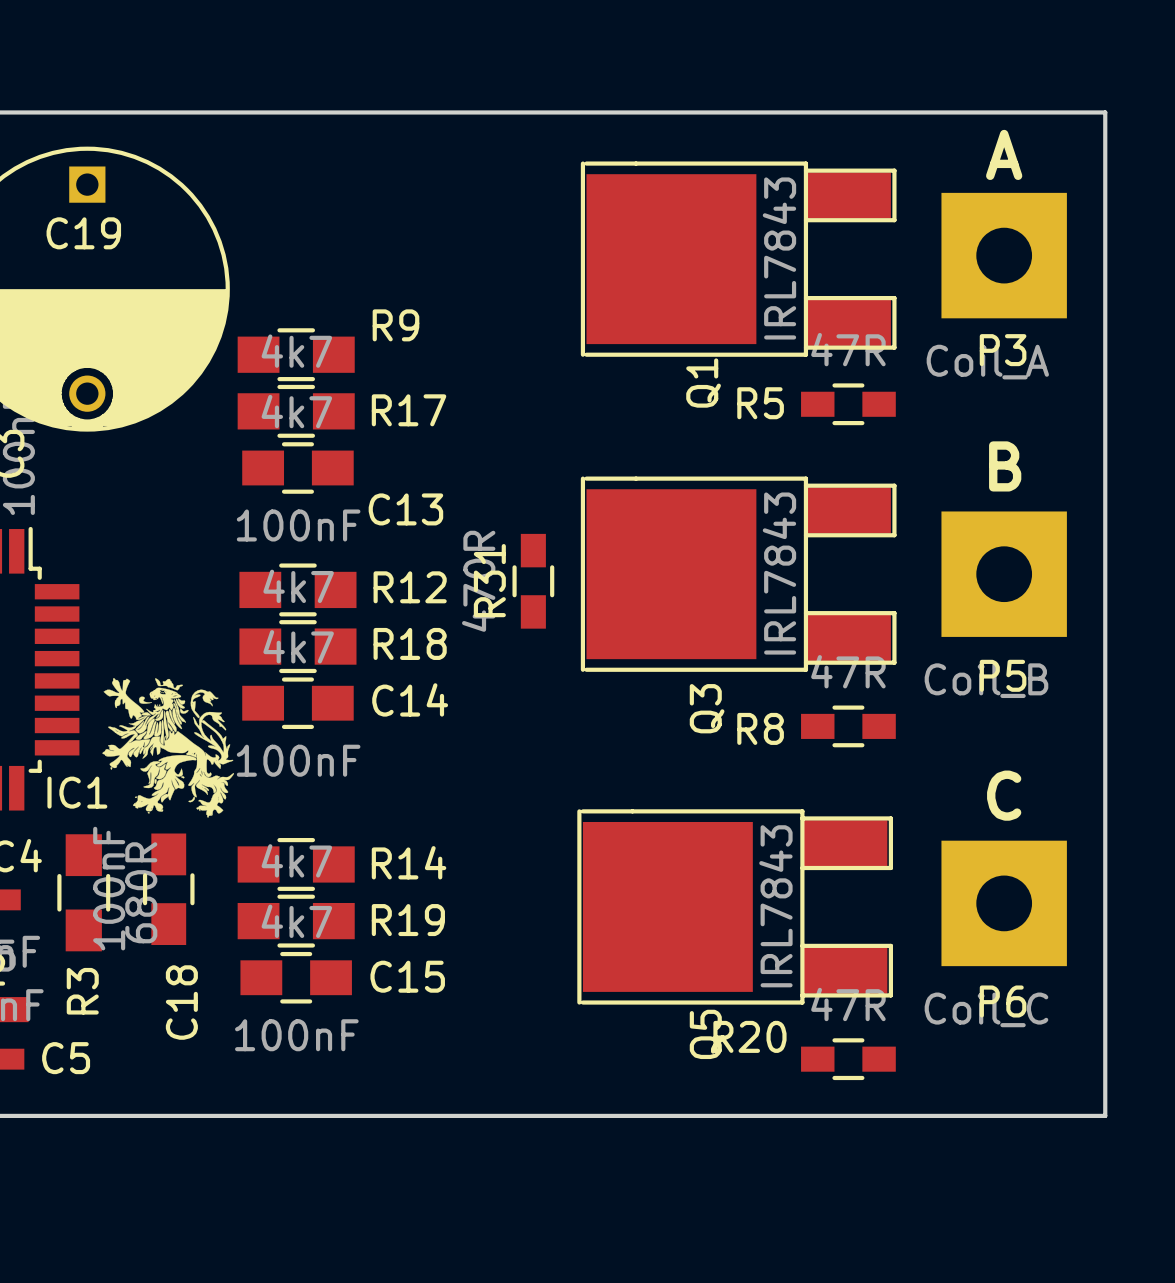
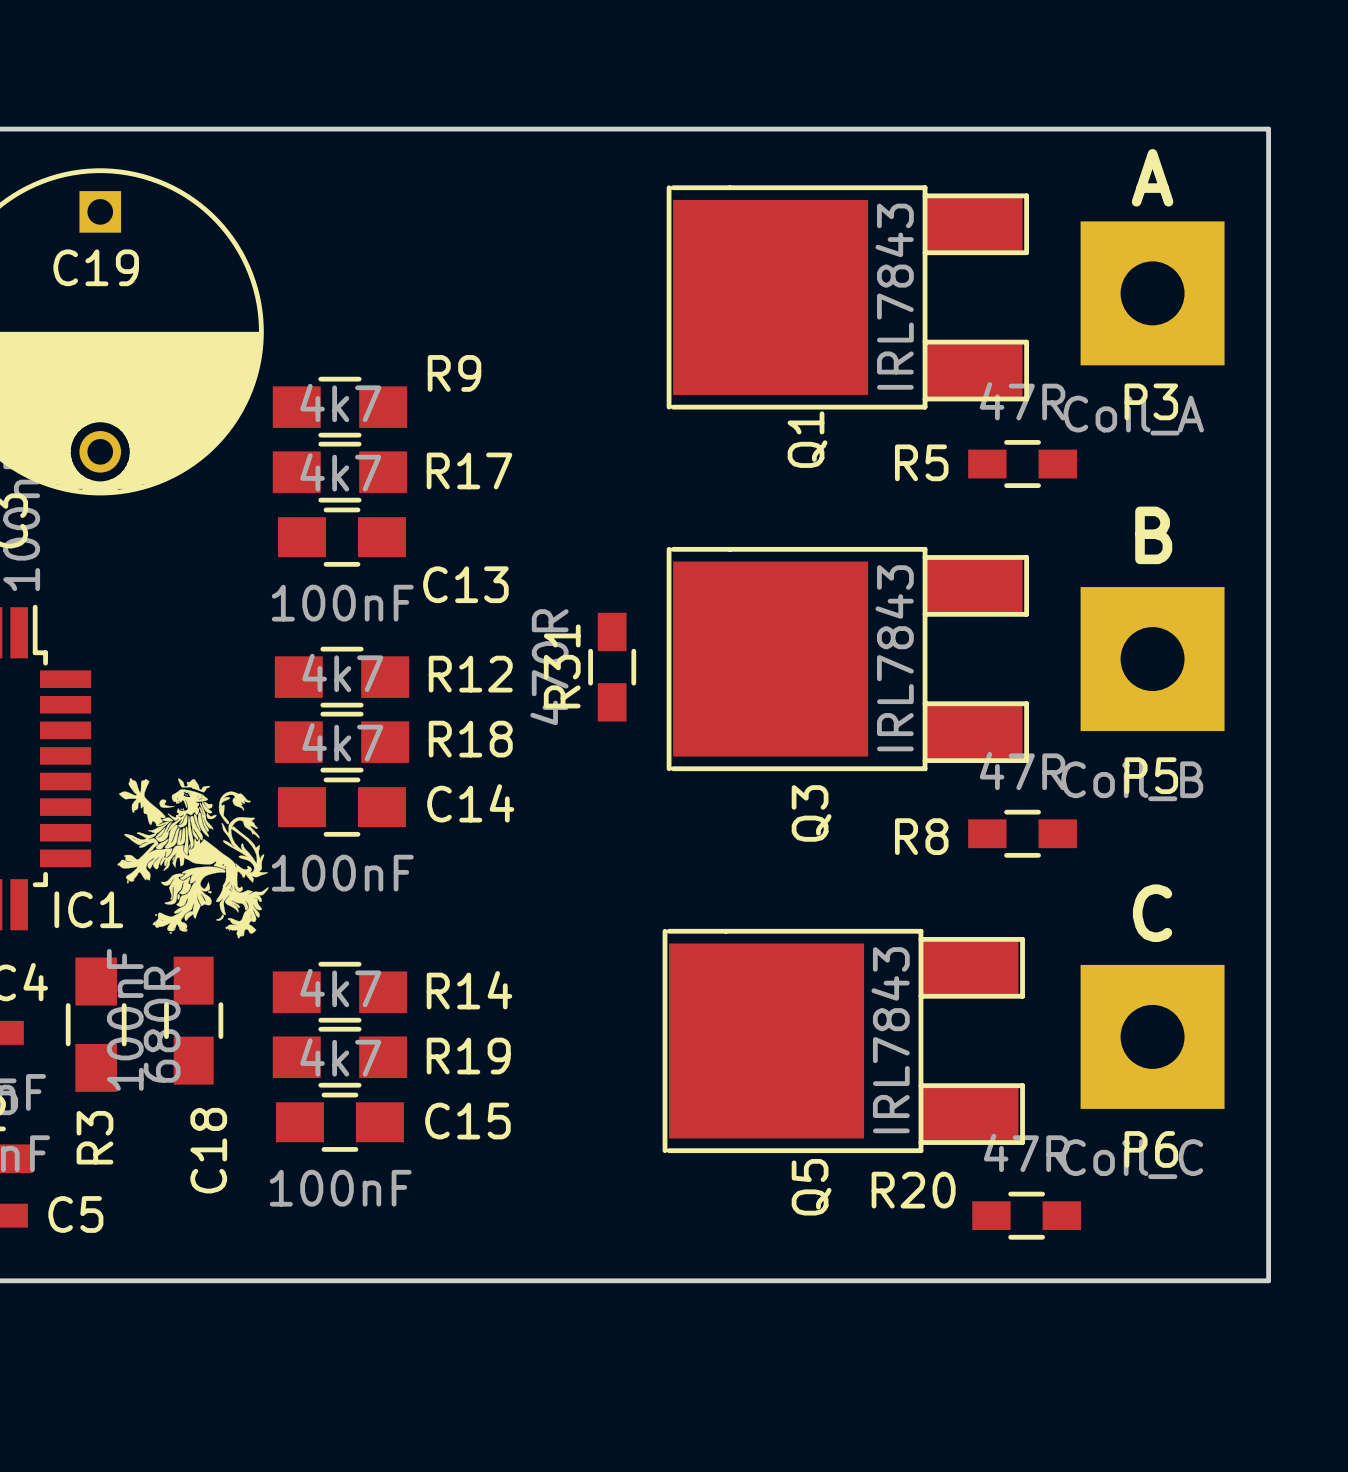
R5 position: (848, 404) -> (1022, 464)
R8 position: (848, 726) -> (1022, 833)
R20 position: (848, 1059) -> (1026, 1215)

